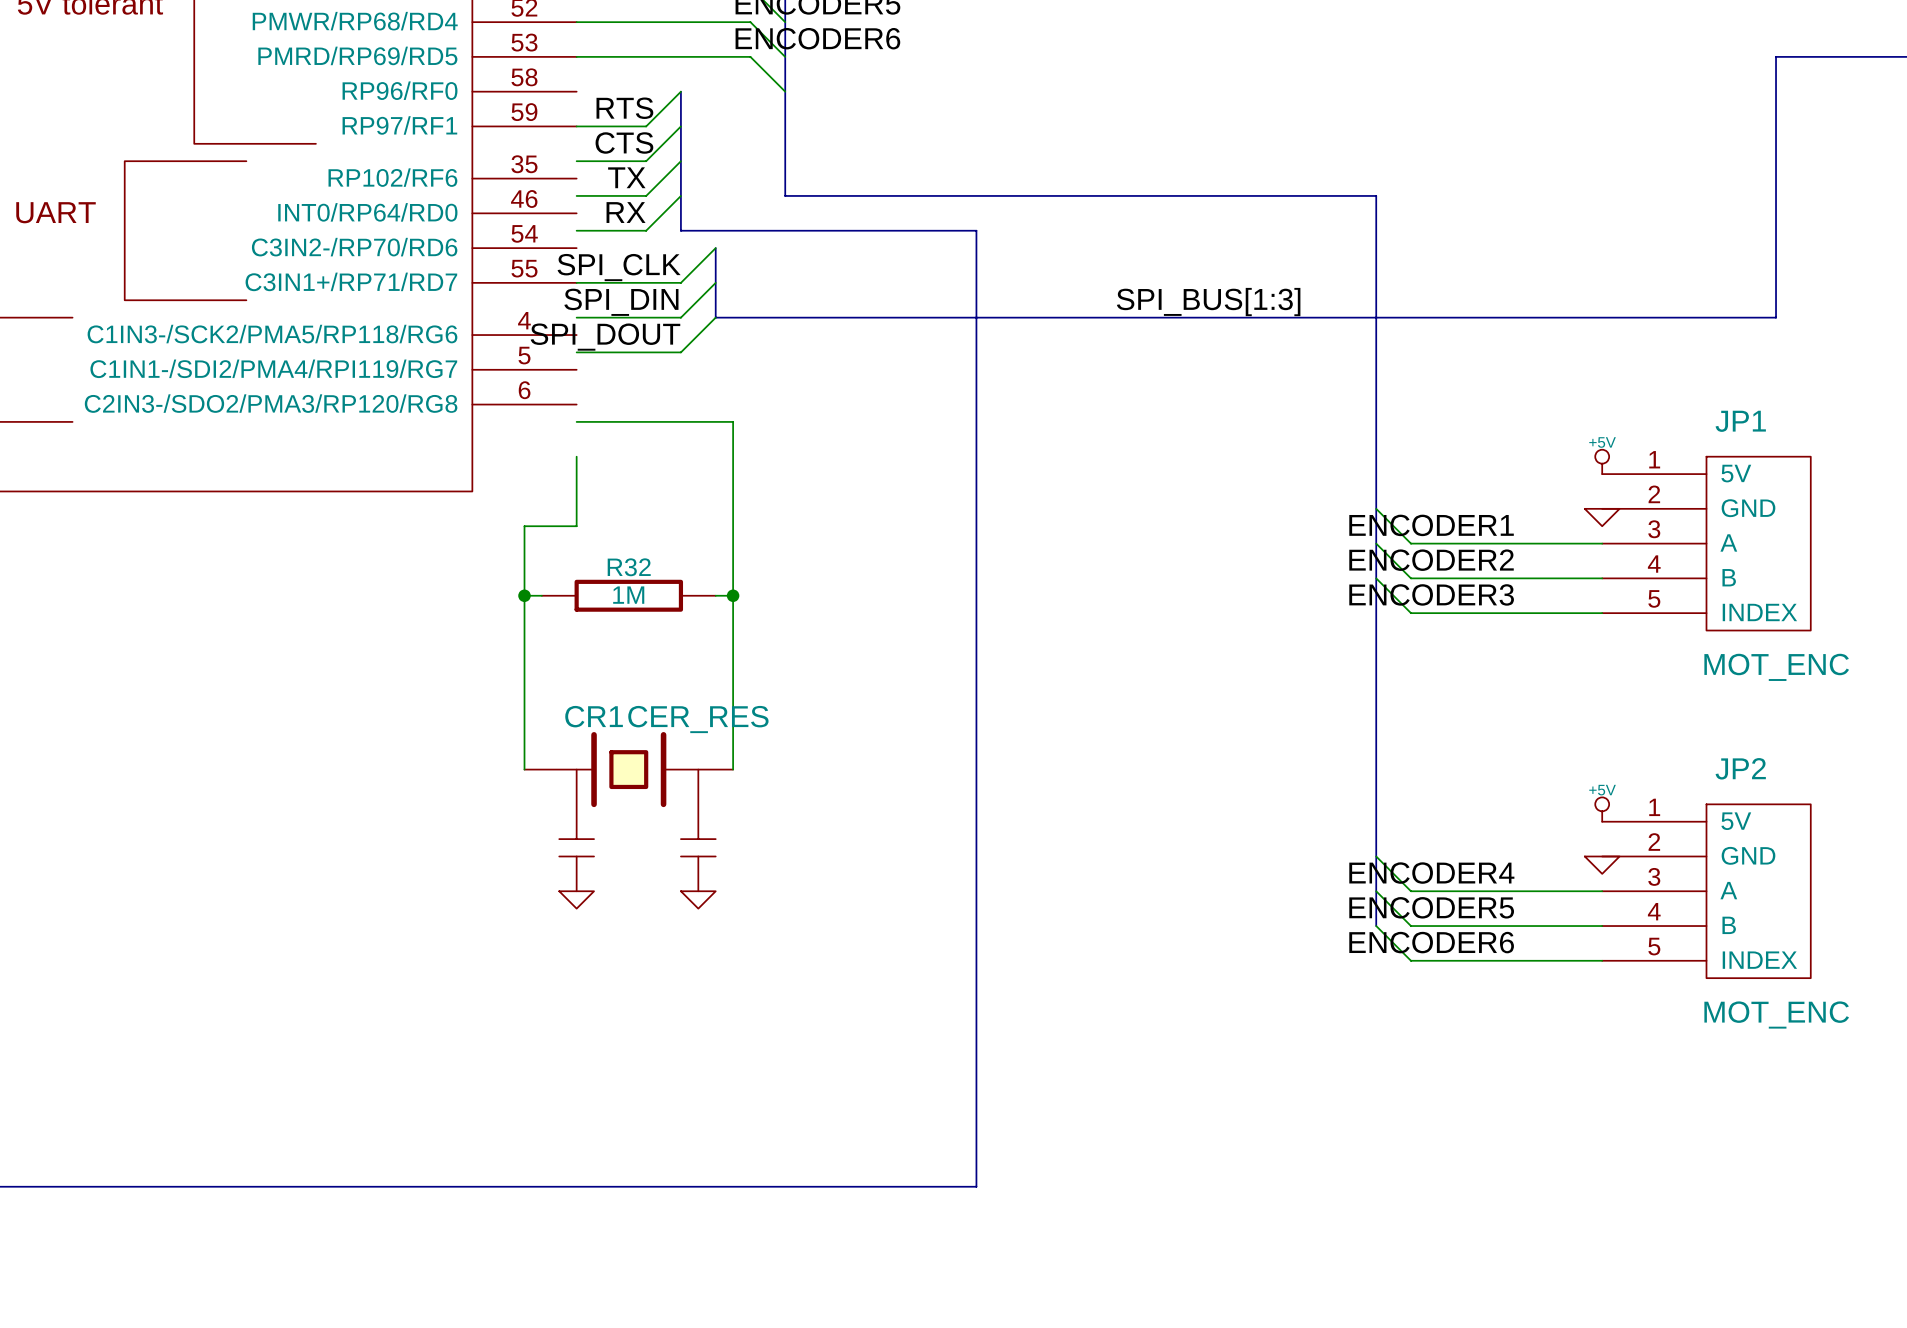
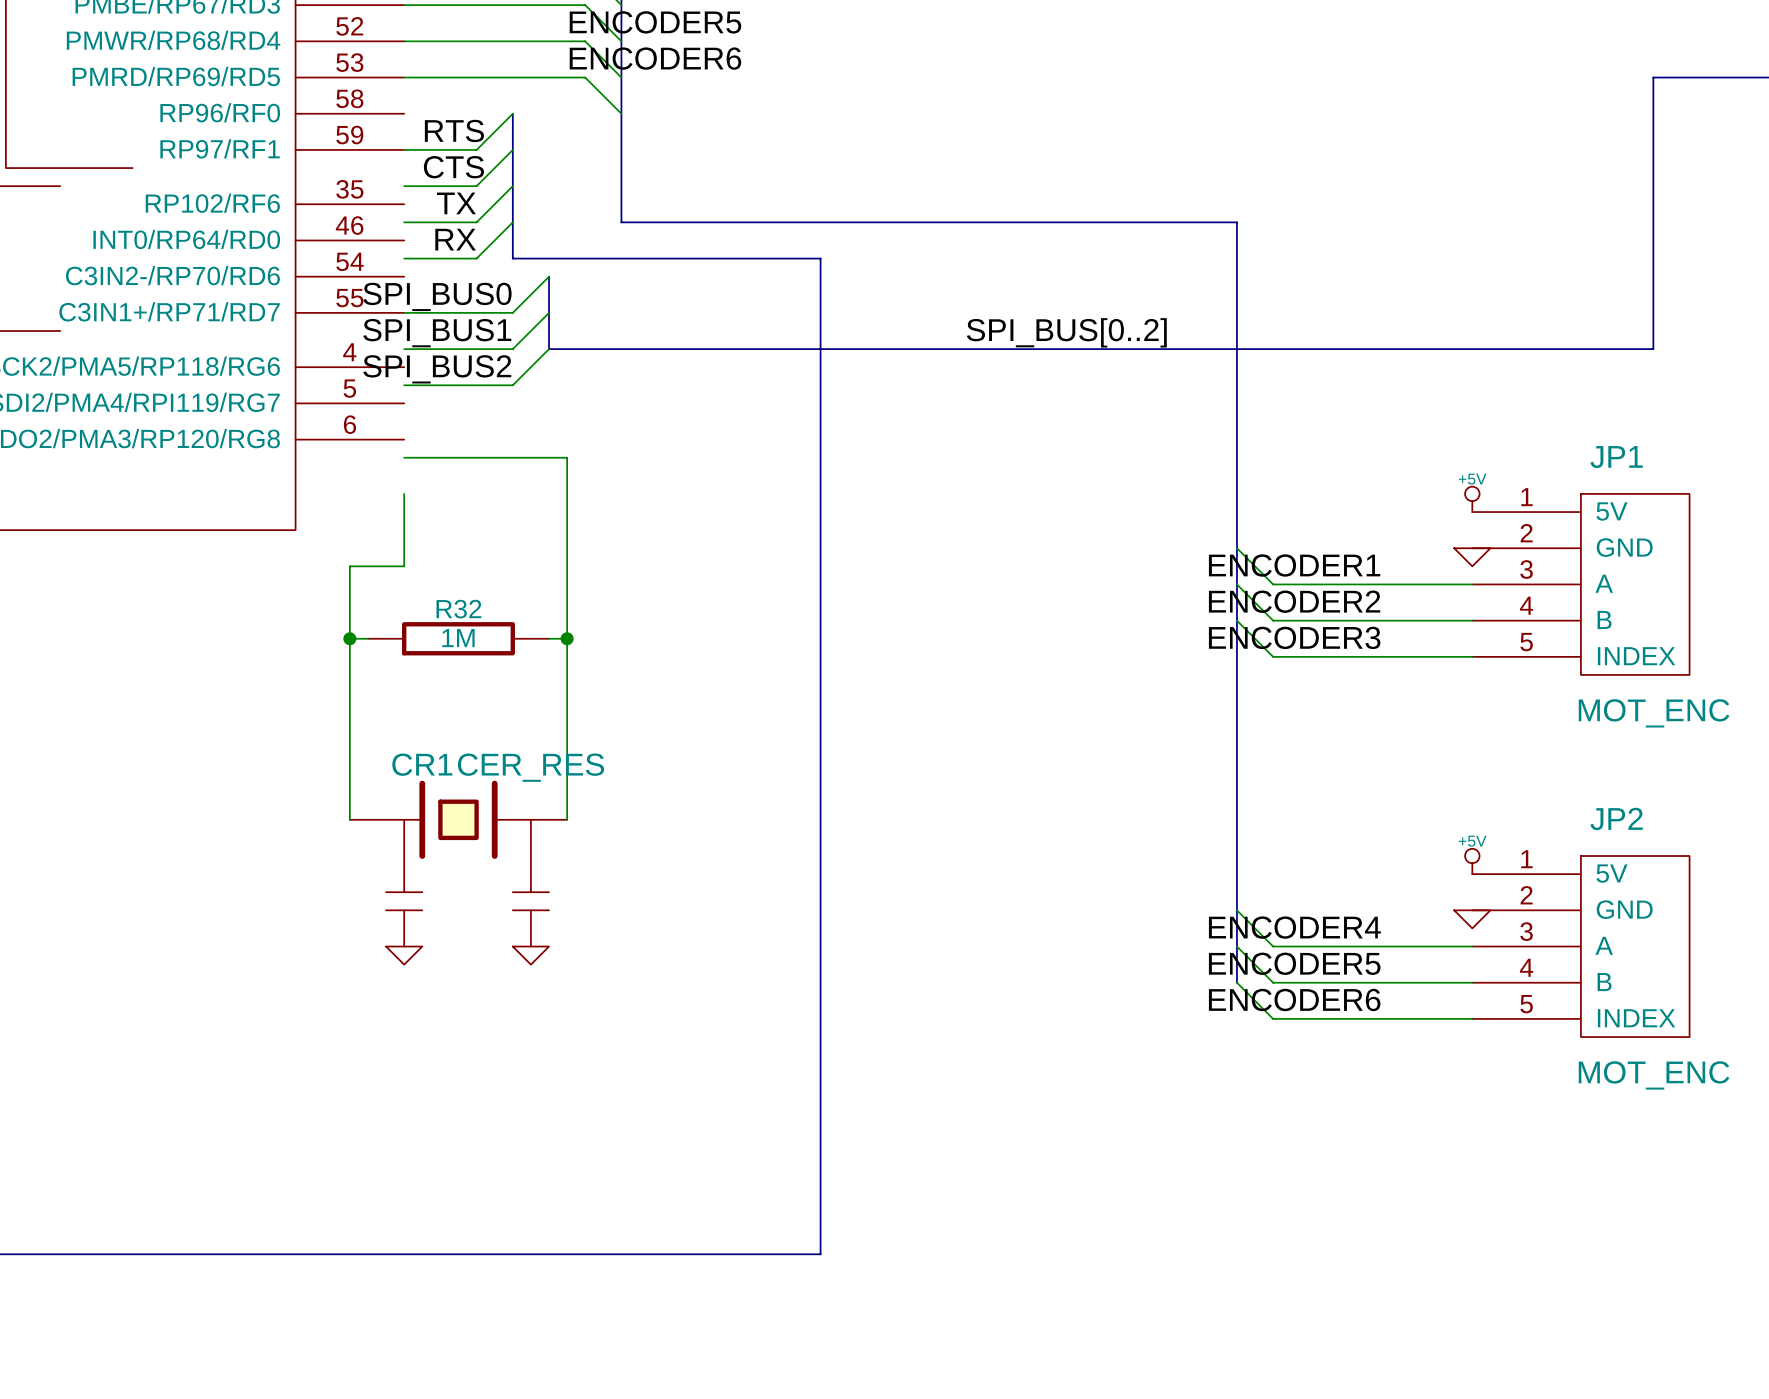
label: SPI_CLK (619, 267) -> SPI_BUS0 (437, 296)
label: SPI_DIN (621, 302) -> SPI_BUS1 (437, 333)
label: SPI_BUS[1:3] (1208, 302) -> SPI_BUS[0..2] (1066, 332)
label: SPI_DOUT (605, 337) -> SPI_BUS2 (437, 369)

